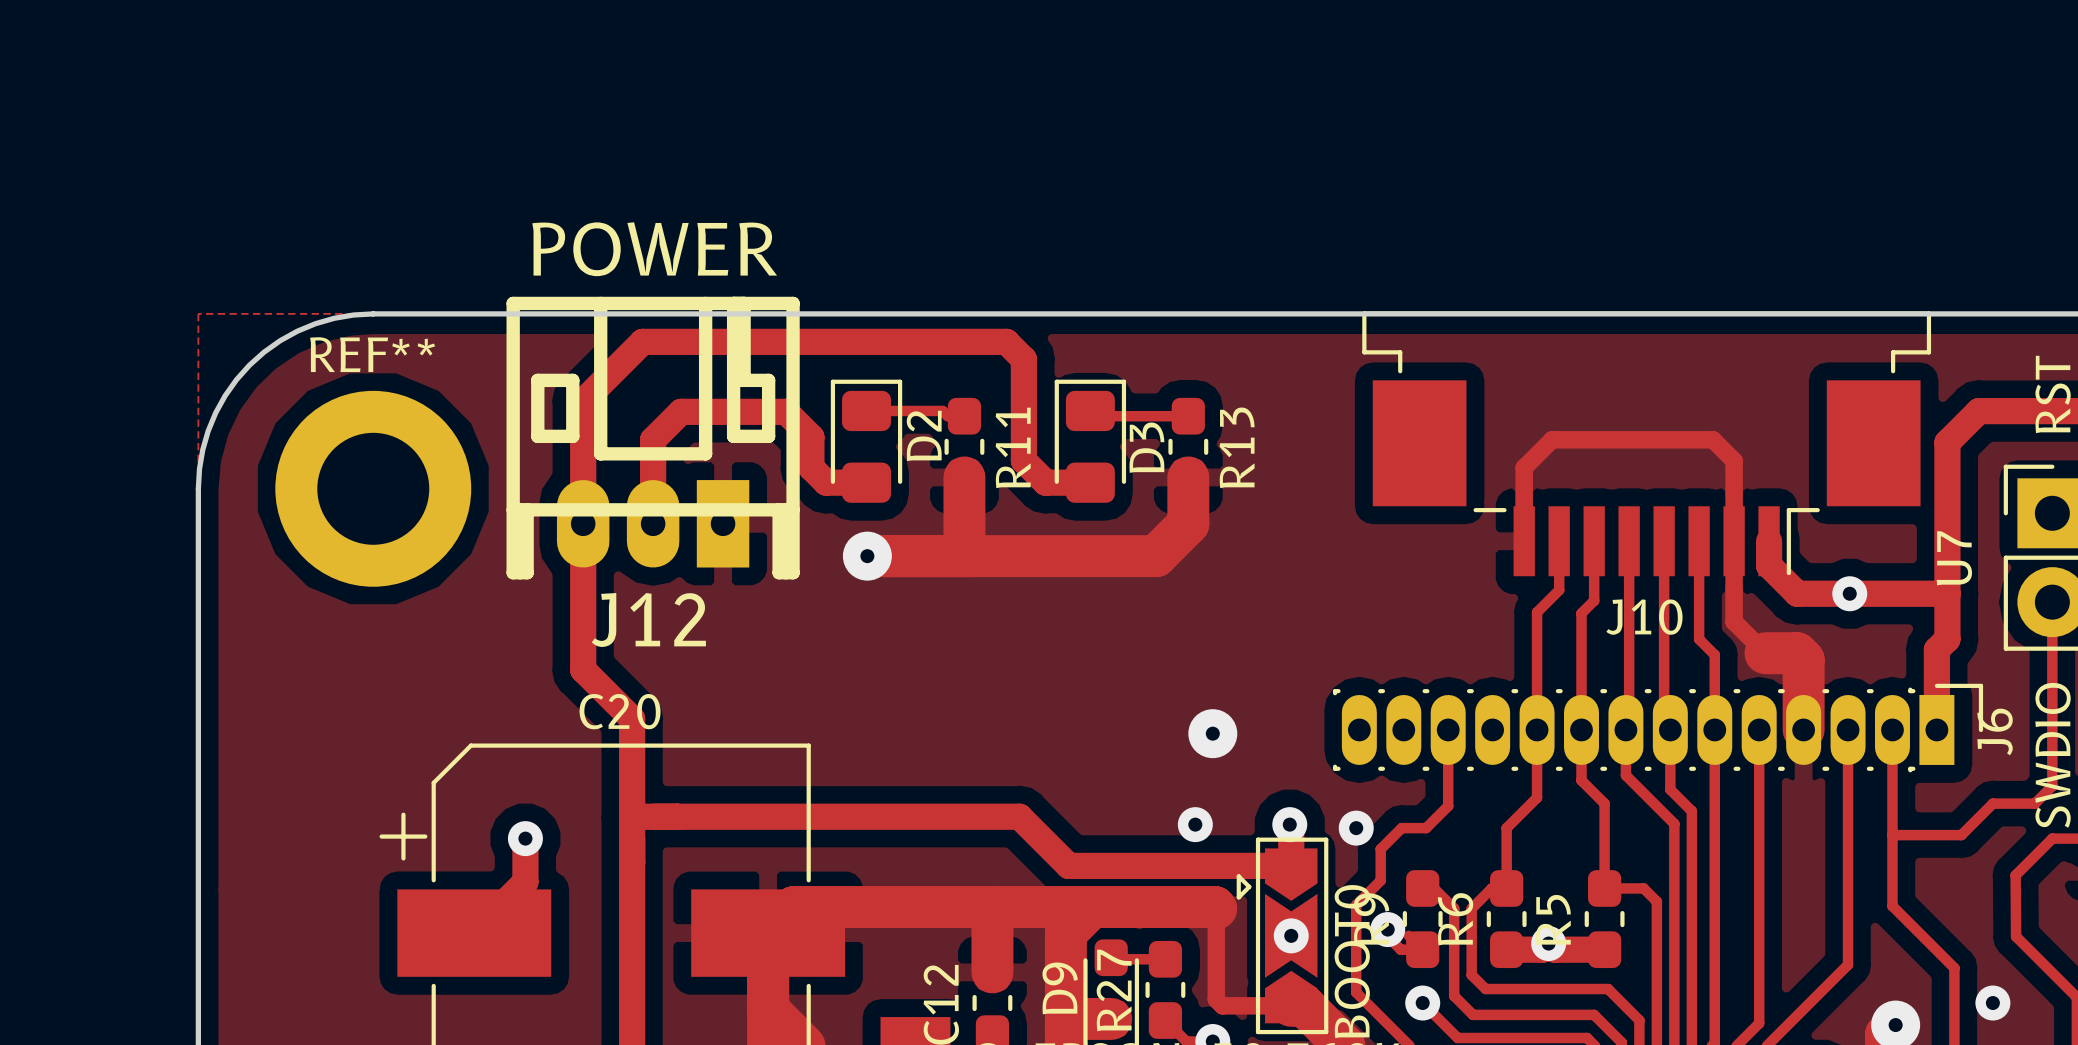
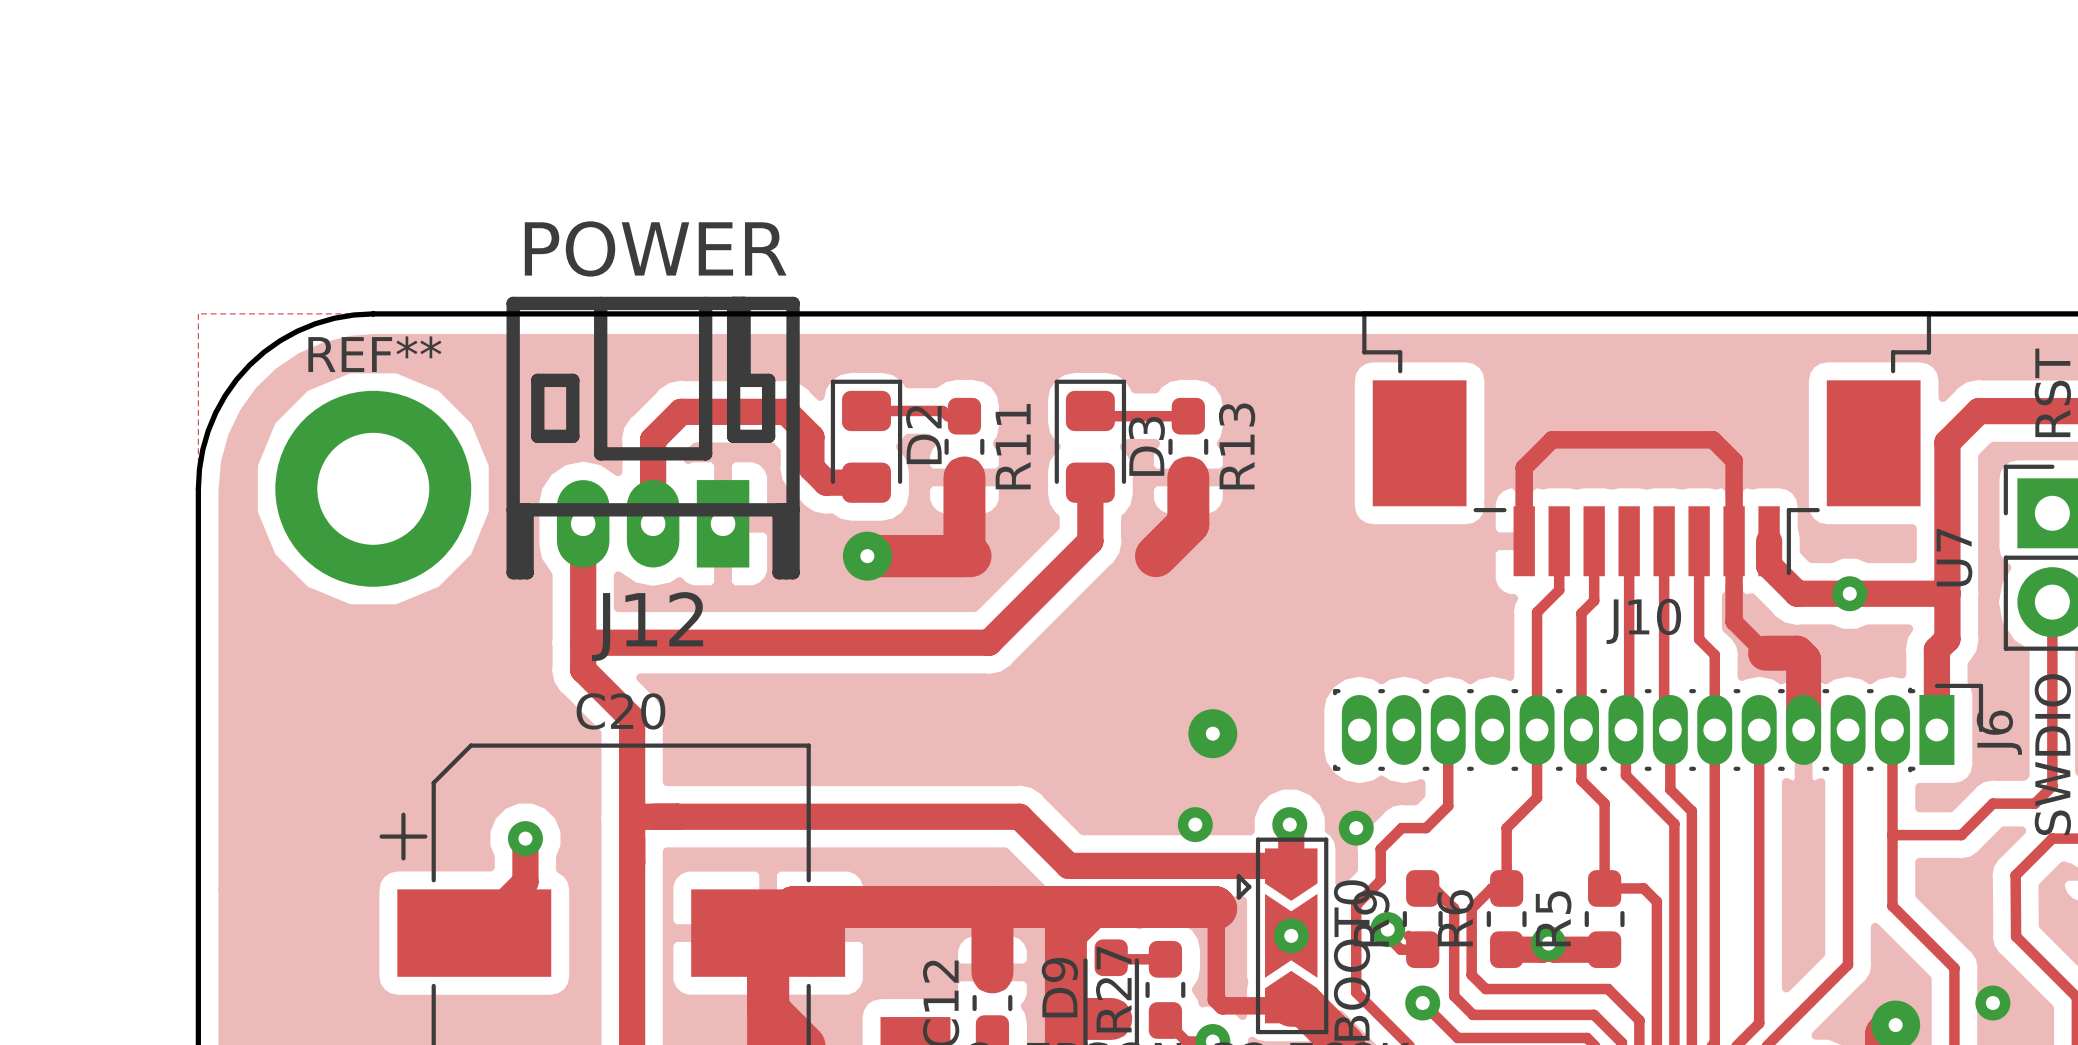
track: (1090, 482) (1045, 482) (1023, 460) (1023, 359) (1006, 341) (642, 341) (583, 401) (583, 523) -> (1090, 482) (1090, 541) (988, 642) (583, 642)
track: (970, 556) (1155, 556) -> none
track width: thick (1765, 653) (1796, 653) (1803, 660) (1803, 729) -> thin (1765, 653) (1796, 653) (1803, 660) (1803, 729)

